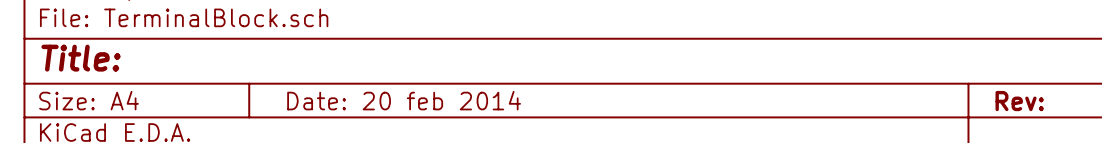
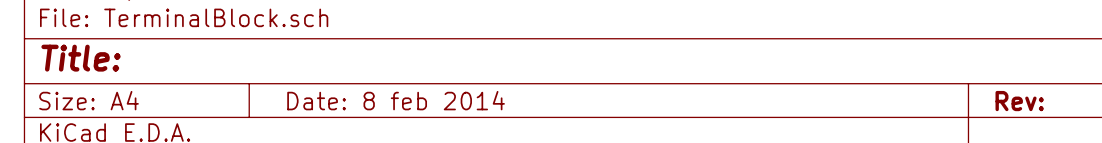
title block: Date: 20 feb 2014 (404, 100) -> Date: 8 feb 2014 (396, 100)

